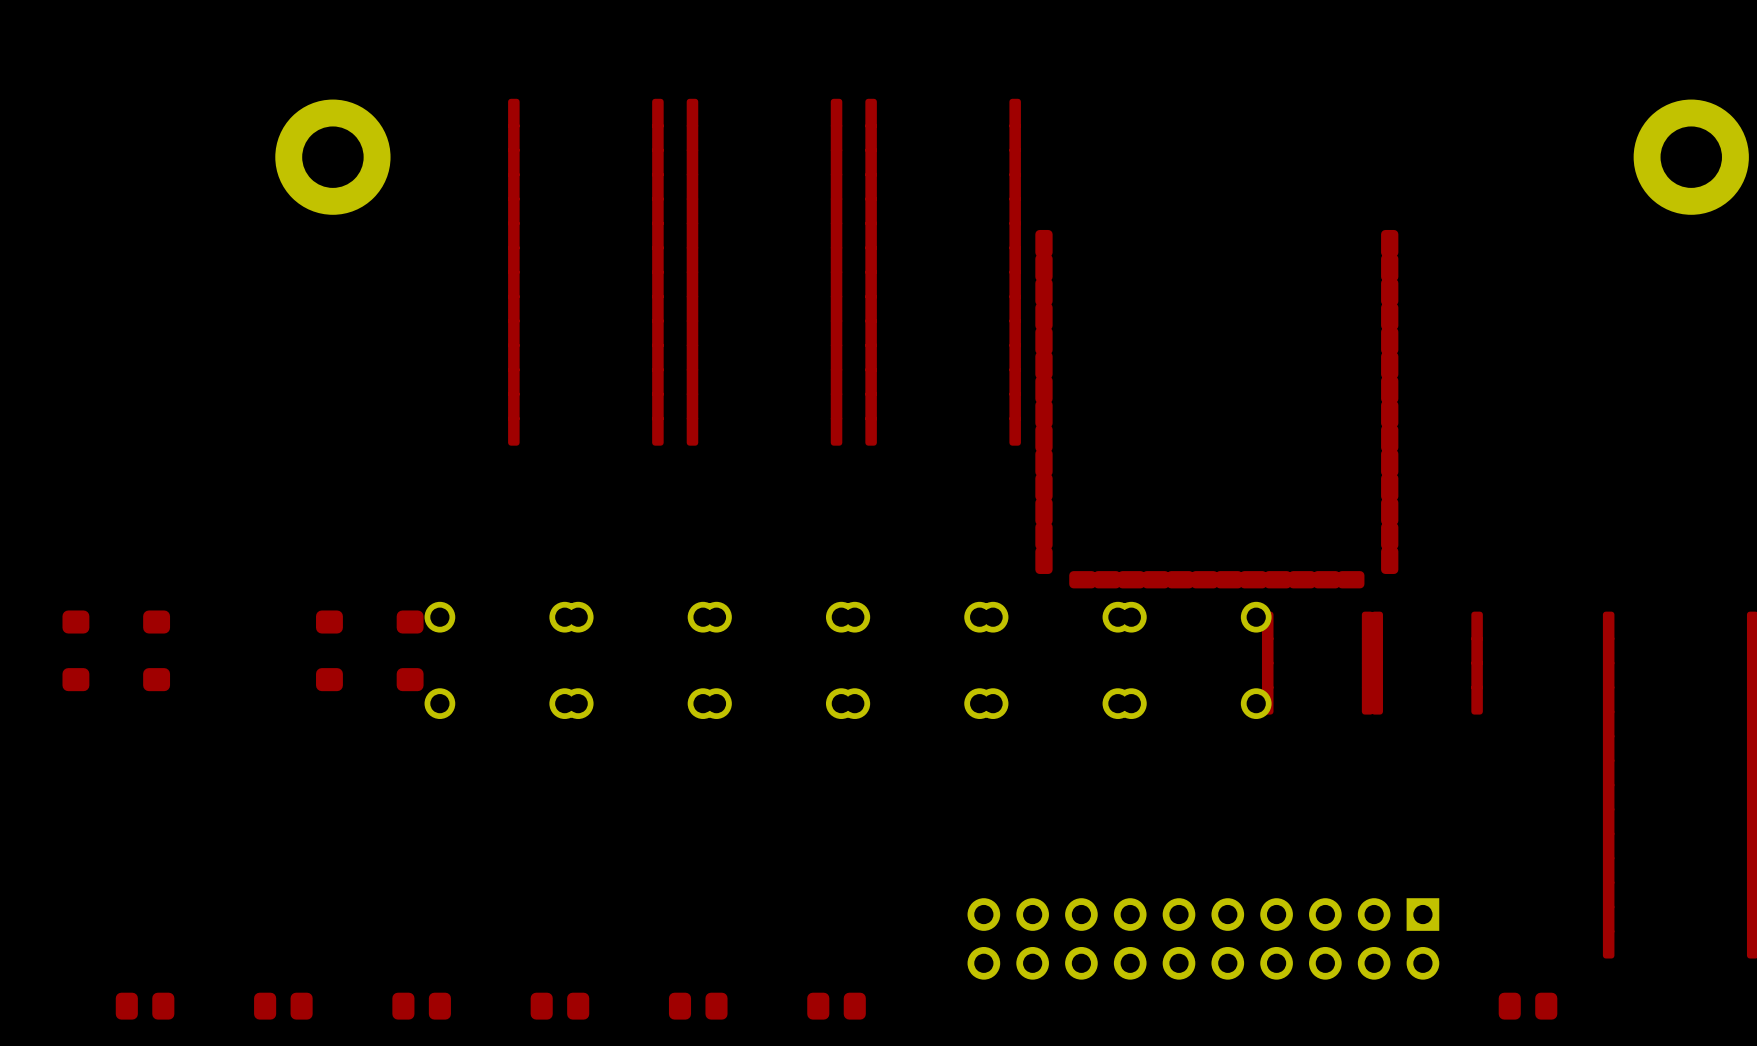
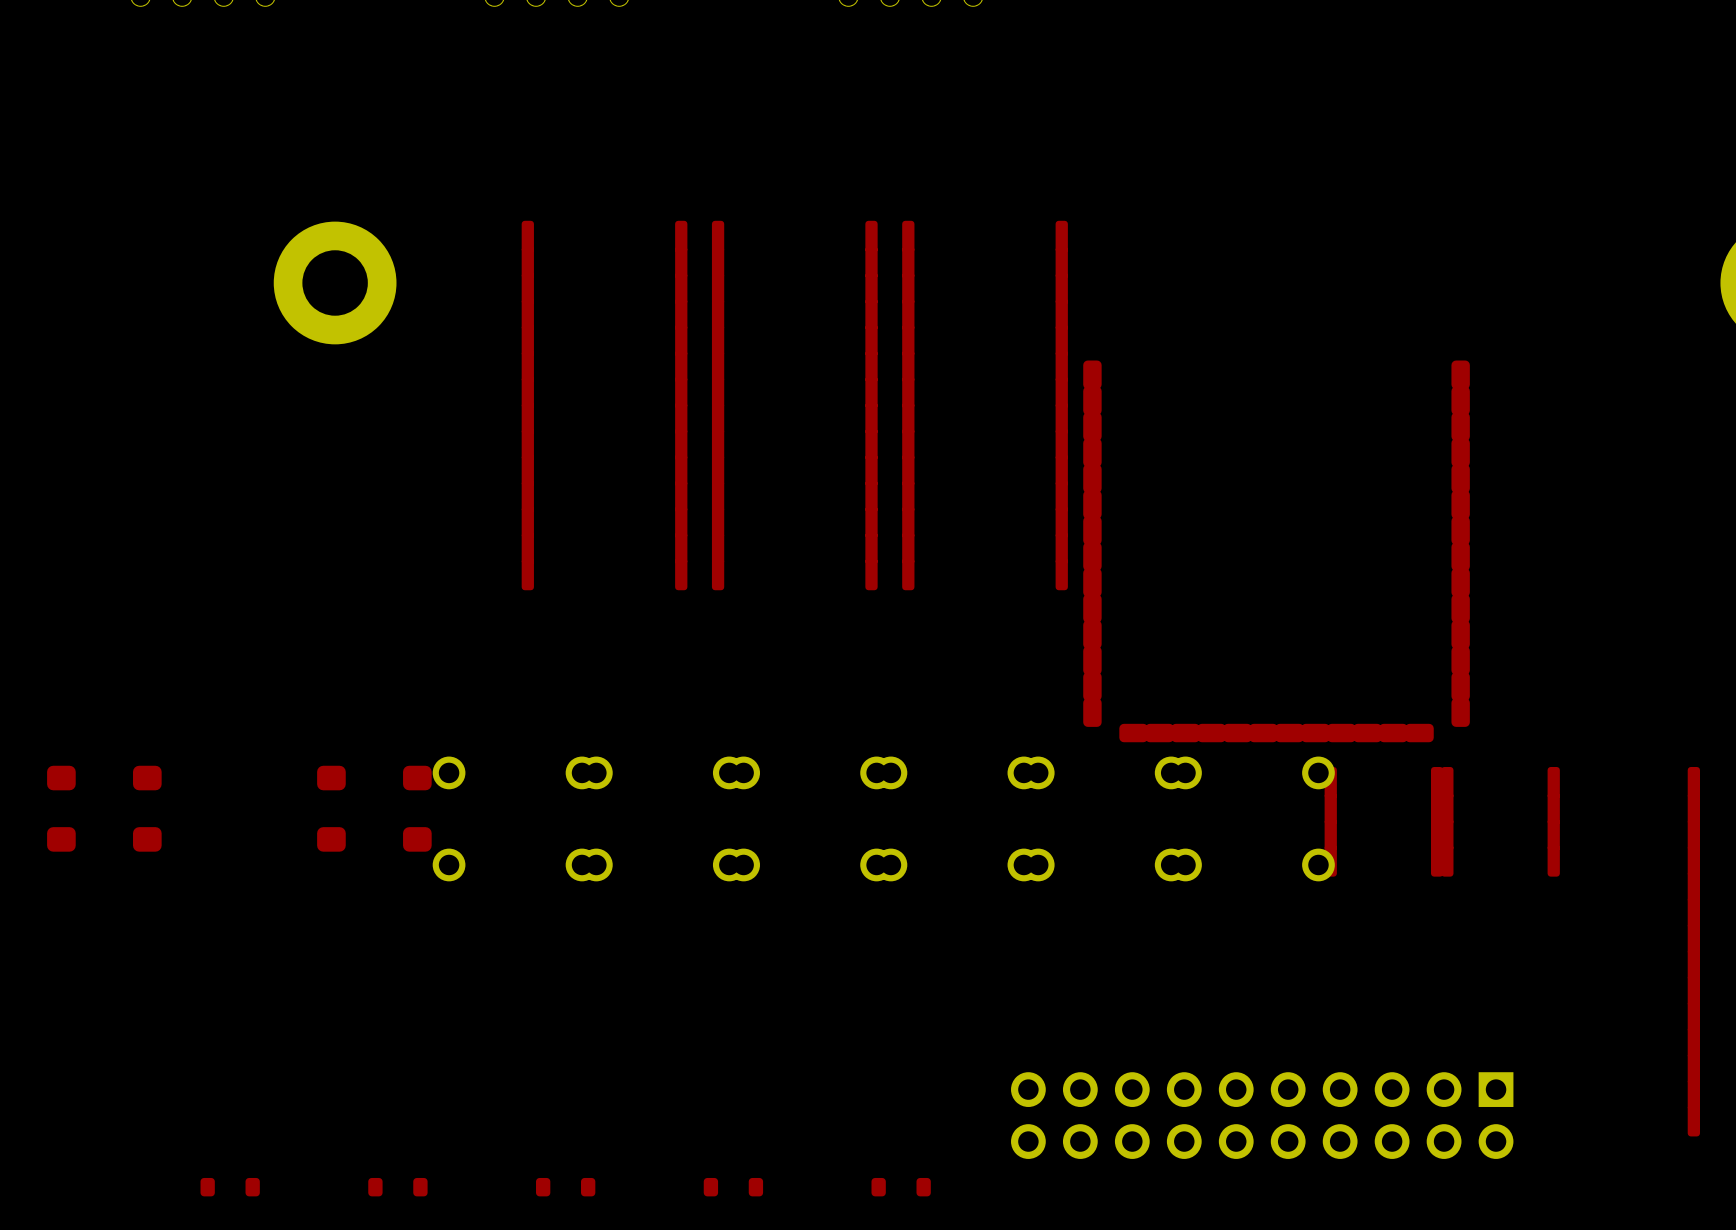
part footprint: [530, 992, 590, 1020] -> [536, 1177, 596, 1197]
part footprint: [668, 992, 728, 1020] -> [703, 1177, 764, 1197]
part: (145, 1006) -> none
part: none -> (230, 1187)
part: (283, 1006) -> none
part: none -> (397, 1187)
part: (421, 1006) -> none
part: (836, 1006) -> none
part: none -> (901, 1187)
part: (1528, 1006) -> none

